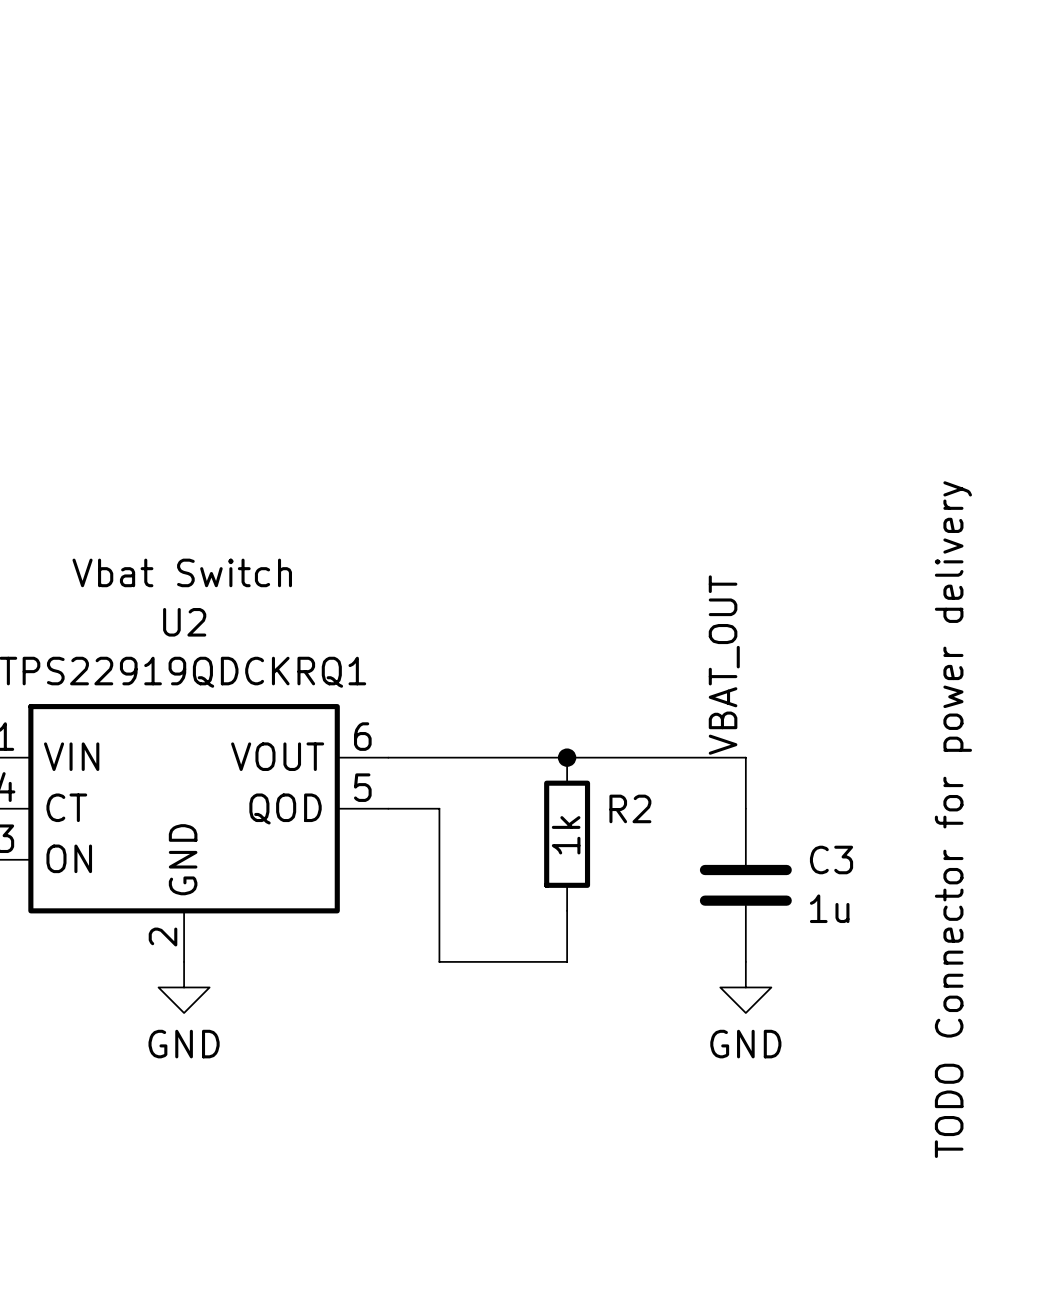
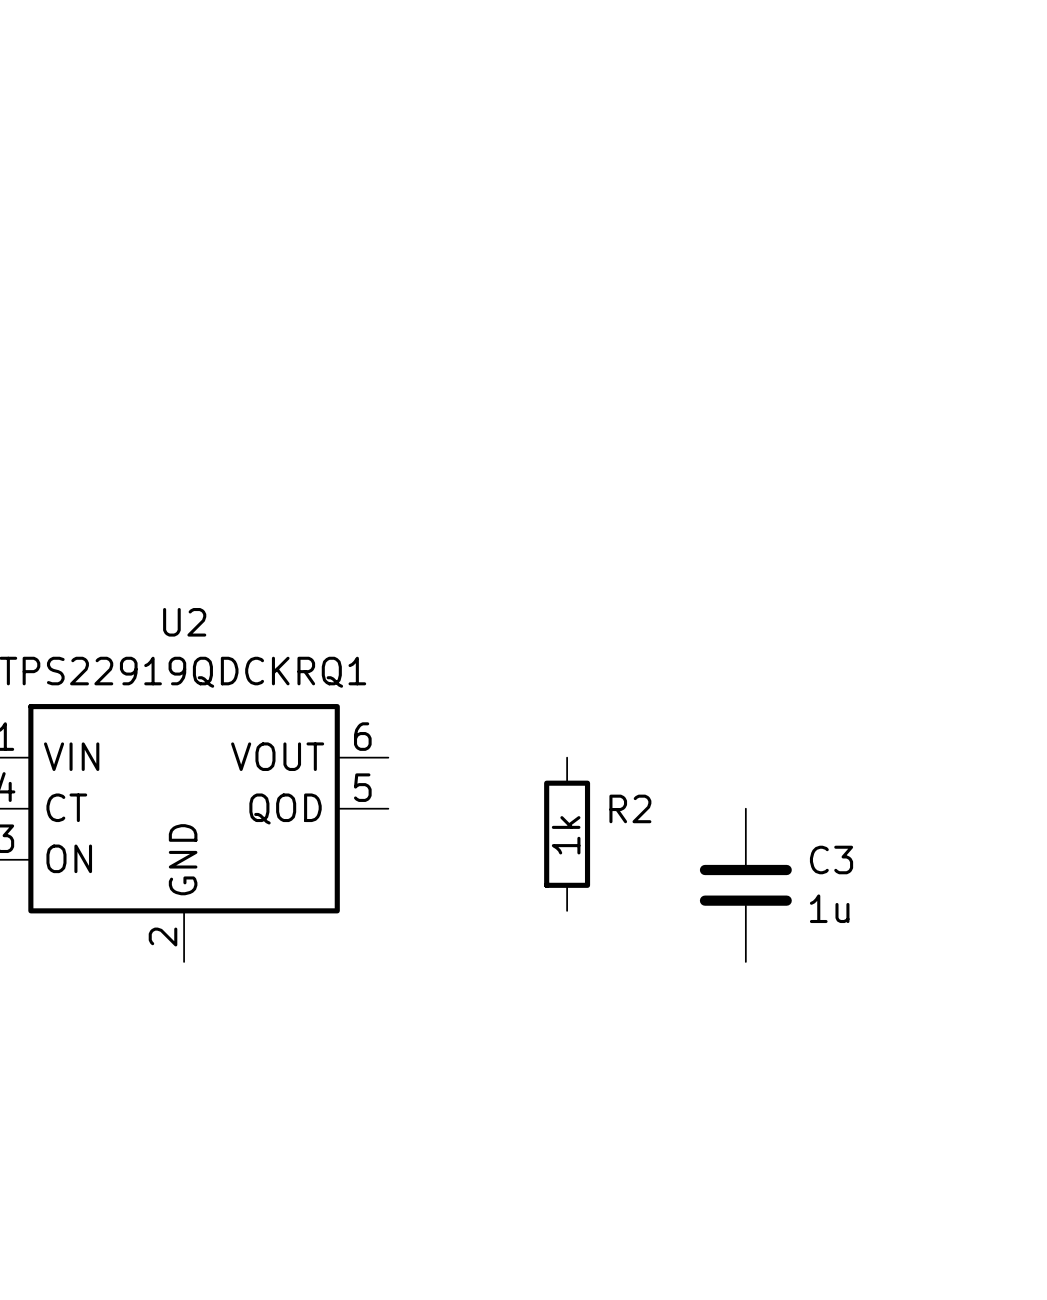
text: Vbat Switch (182, 572) -> none
label: VBAT_OUT (724, 665) -> none
wire: (388, 757) (745, 757) (745, 808) -> none
junction: (567, 757) -> none
wire: (388, 808) (439, 808) (439, 961) (567, 961) (567, 910) -> none
text: TODO Connector for power delivery (953, 819) -> none
power symbol: GND (184, 987) -> none
power symbol: GND (745, 987) -> none

